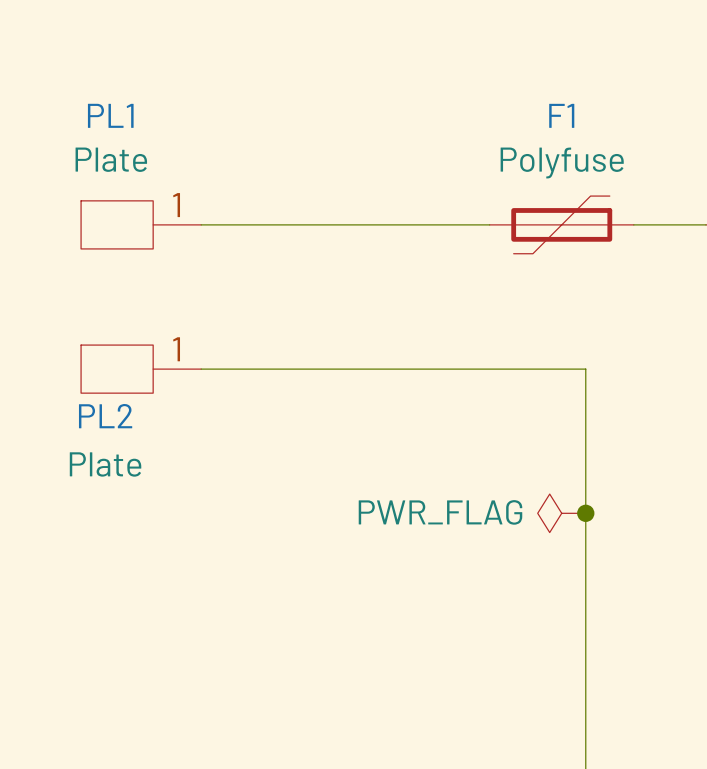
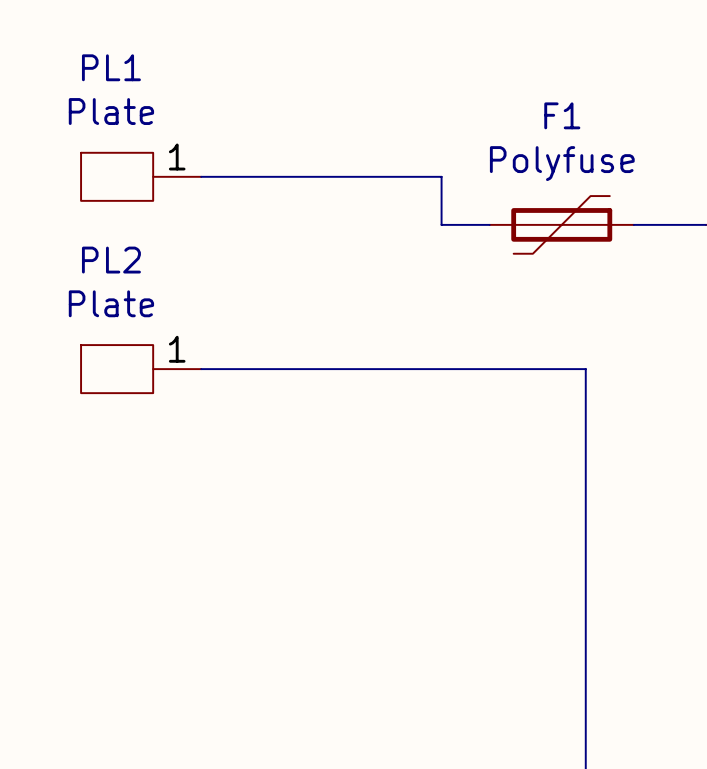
PL1 position: (141, 224) -> (141, 176)
wire: (201, 224) (441, 224) -> (201, 176) (441, 176) (441, 224)
PL2 name position: PL2 (105, 416) -> PL2 (111, 260)
PL2 value position: Plate (105, 464) -> Plate (111, 303)
power symbol: PWR_FLAG (561, 513) -> none
junction: (585, 513) -> none

